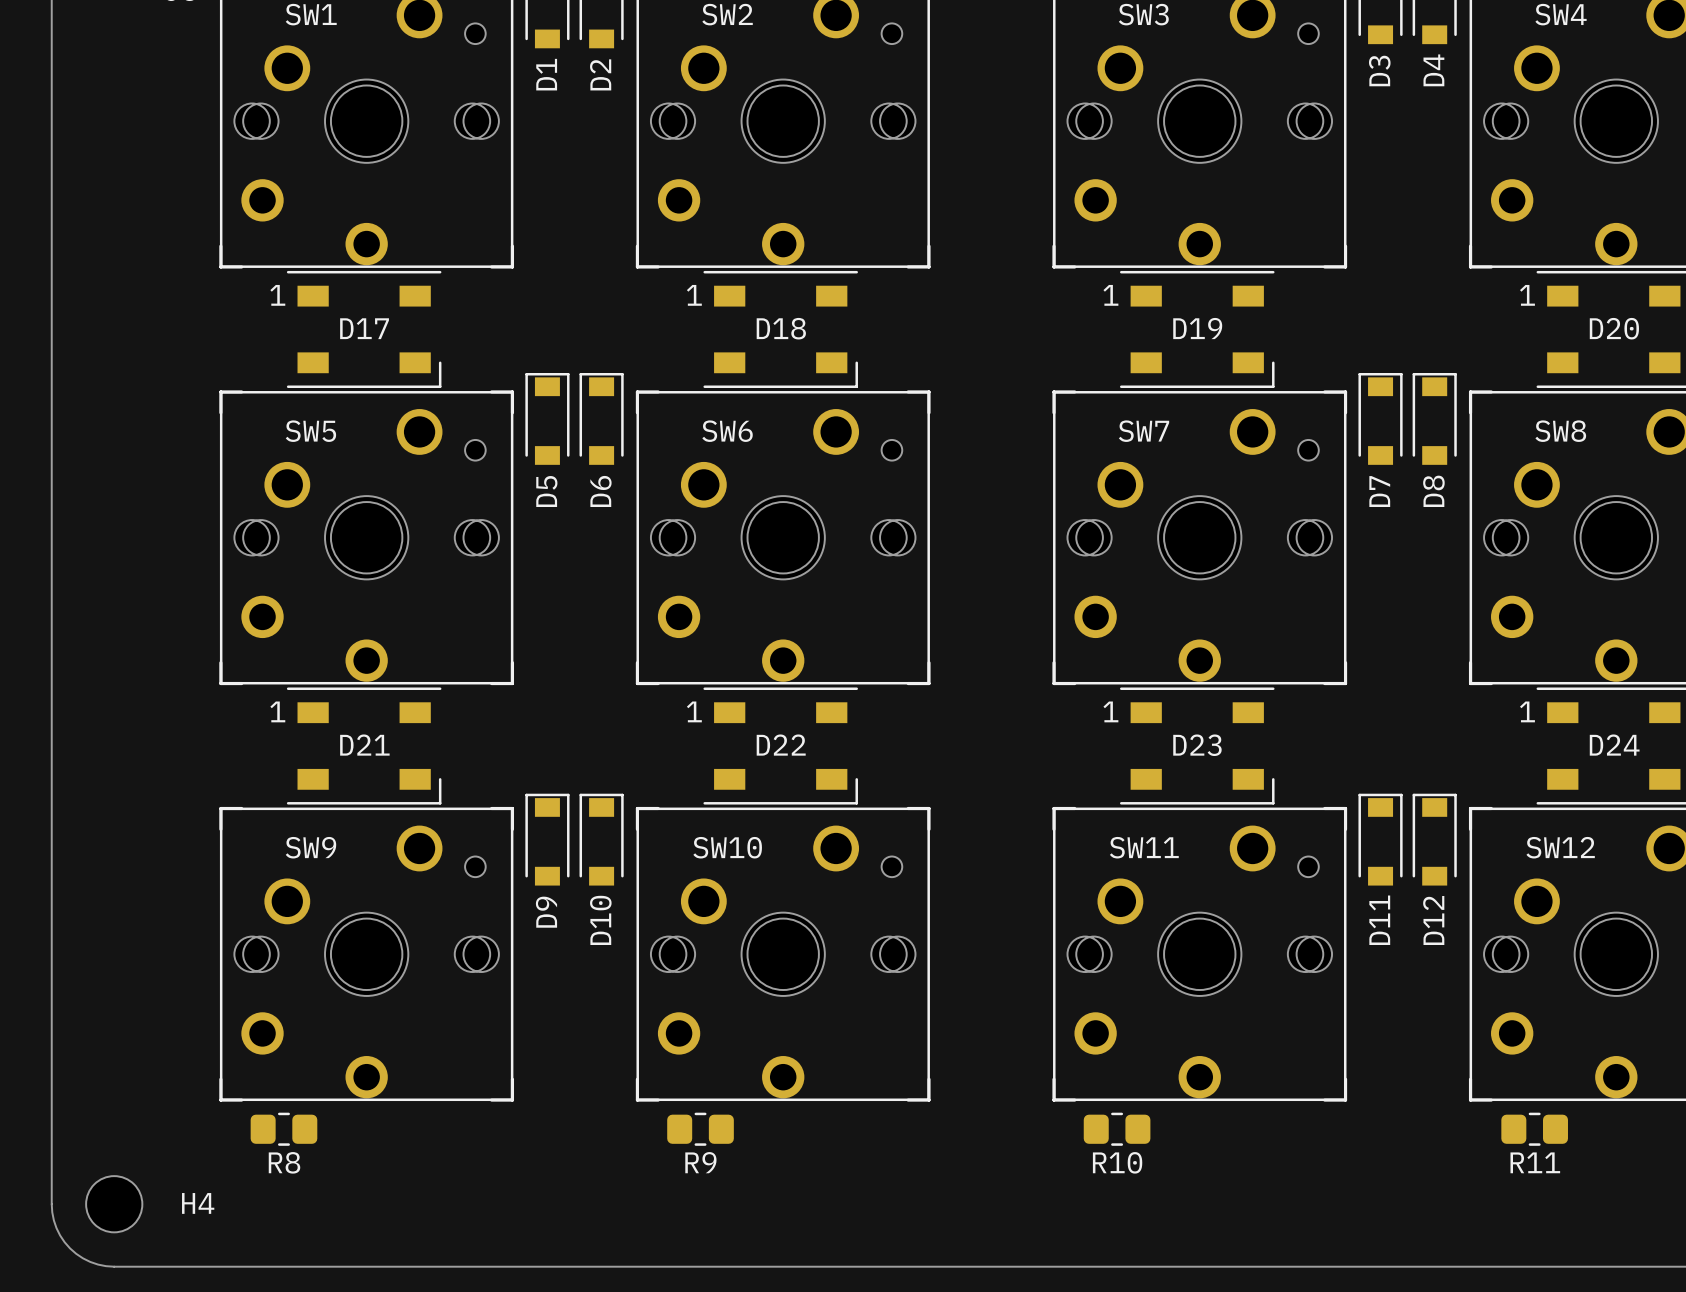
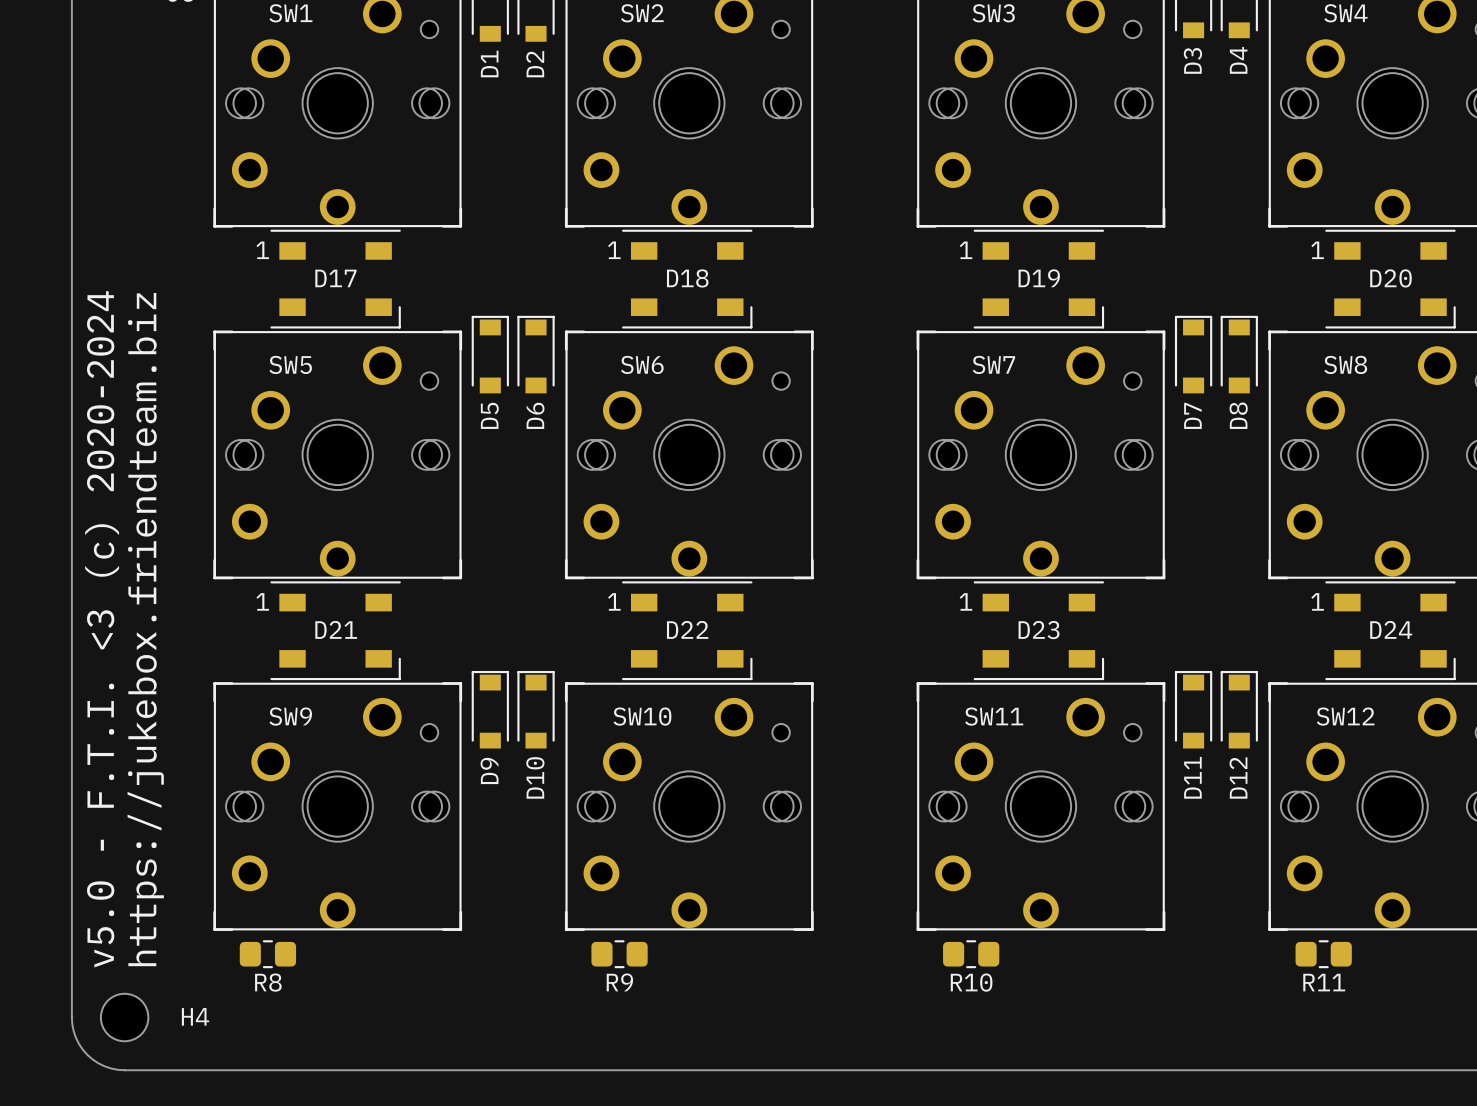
text: none -> v5.0 - F.T.I. <3 (c) 2020-2024 (102, 629)
text: none -> https://jukebox.friendteam.biz (145, 629)

